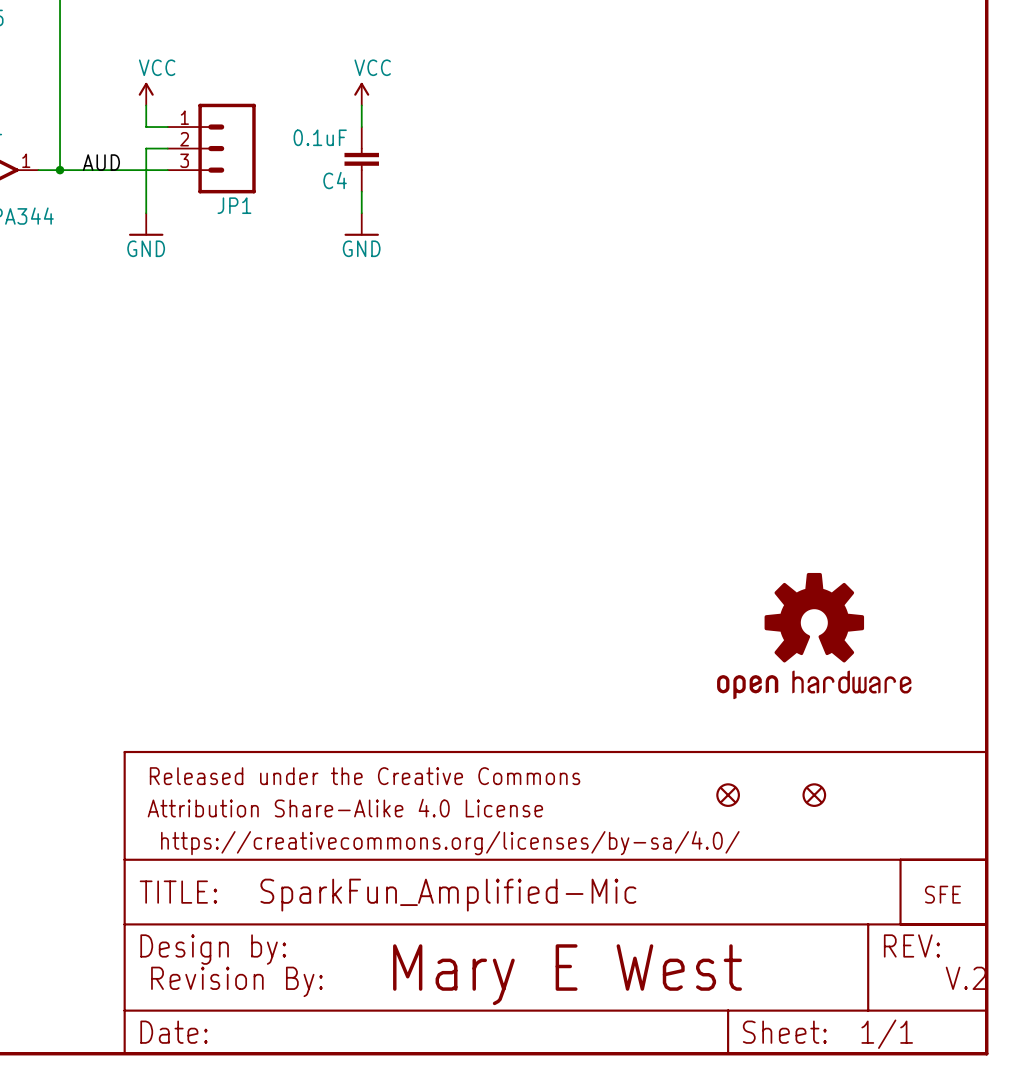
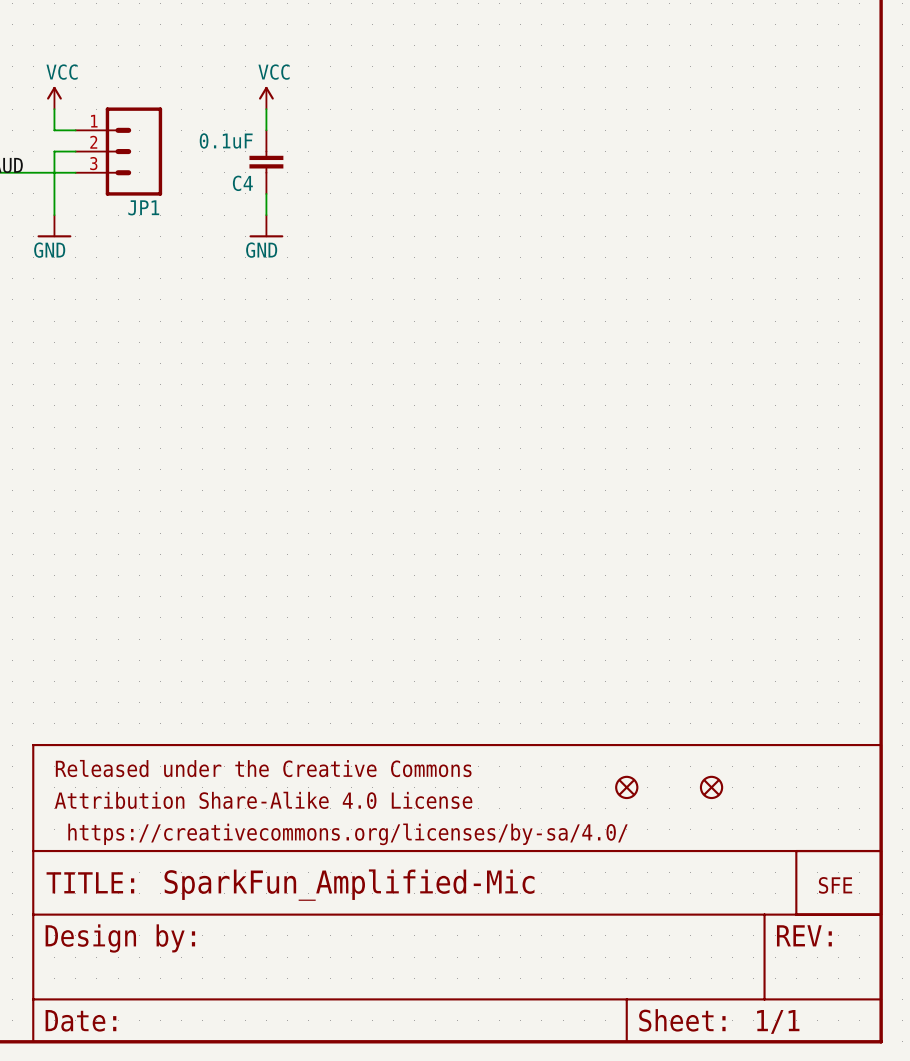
part: (814, 636) -> none
text: Mary E West (567, 974) -> none
text: V.2 (966, 978) -> none
part: (236, 981) -> none

